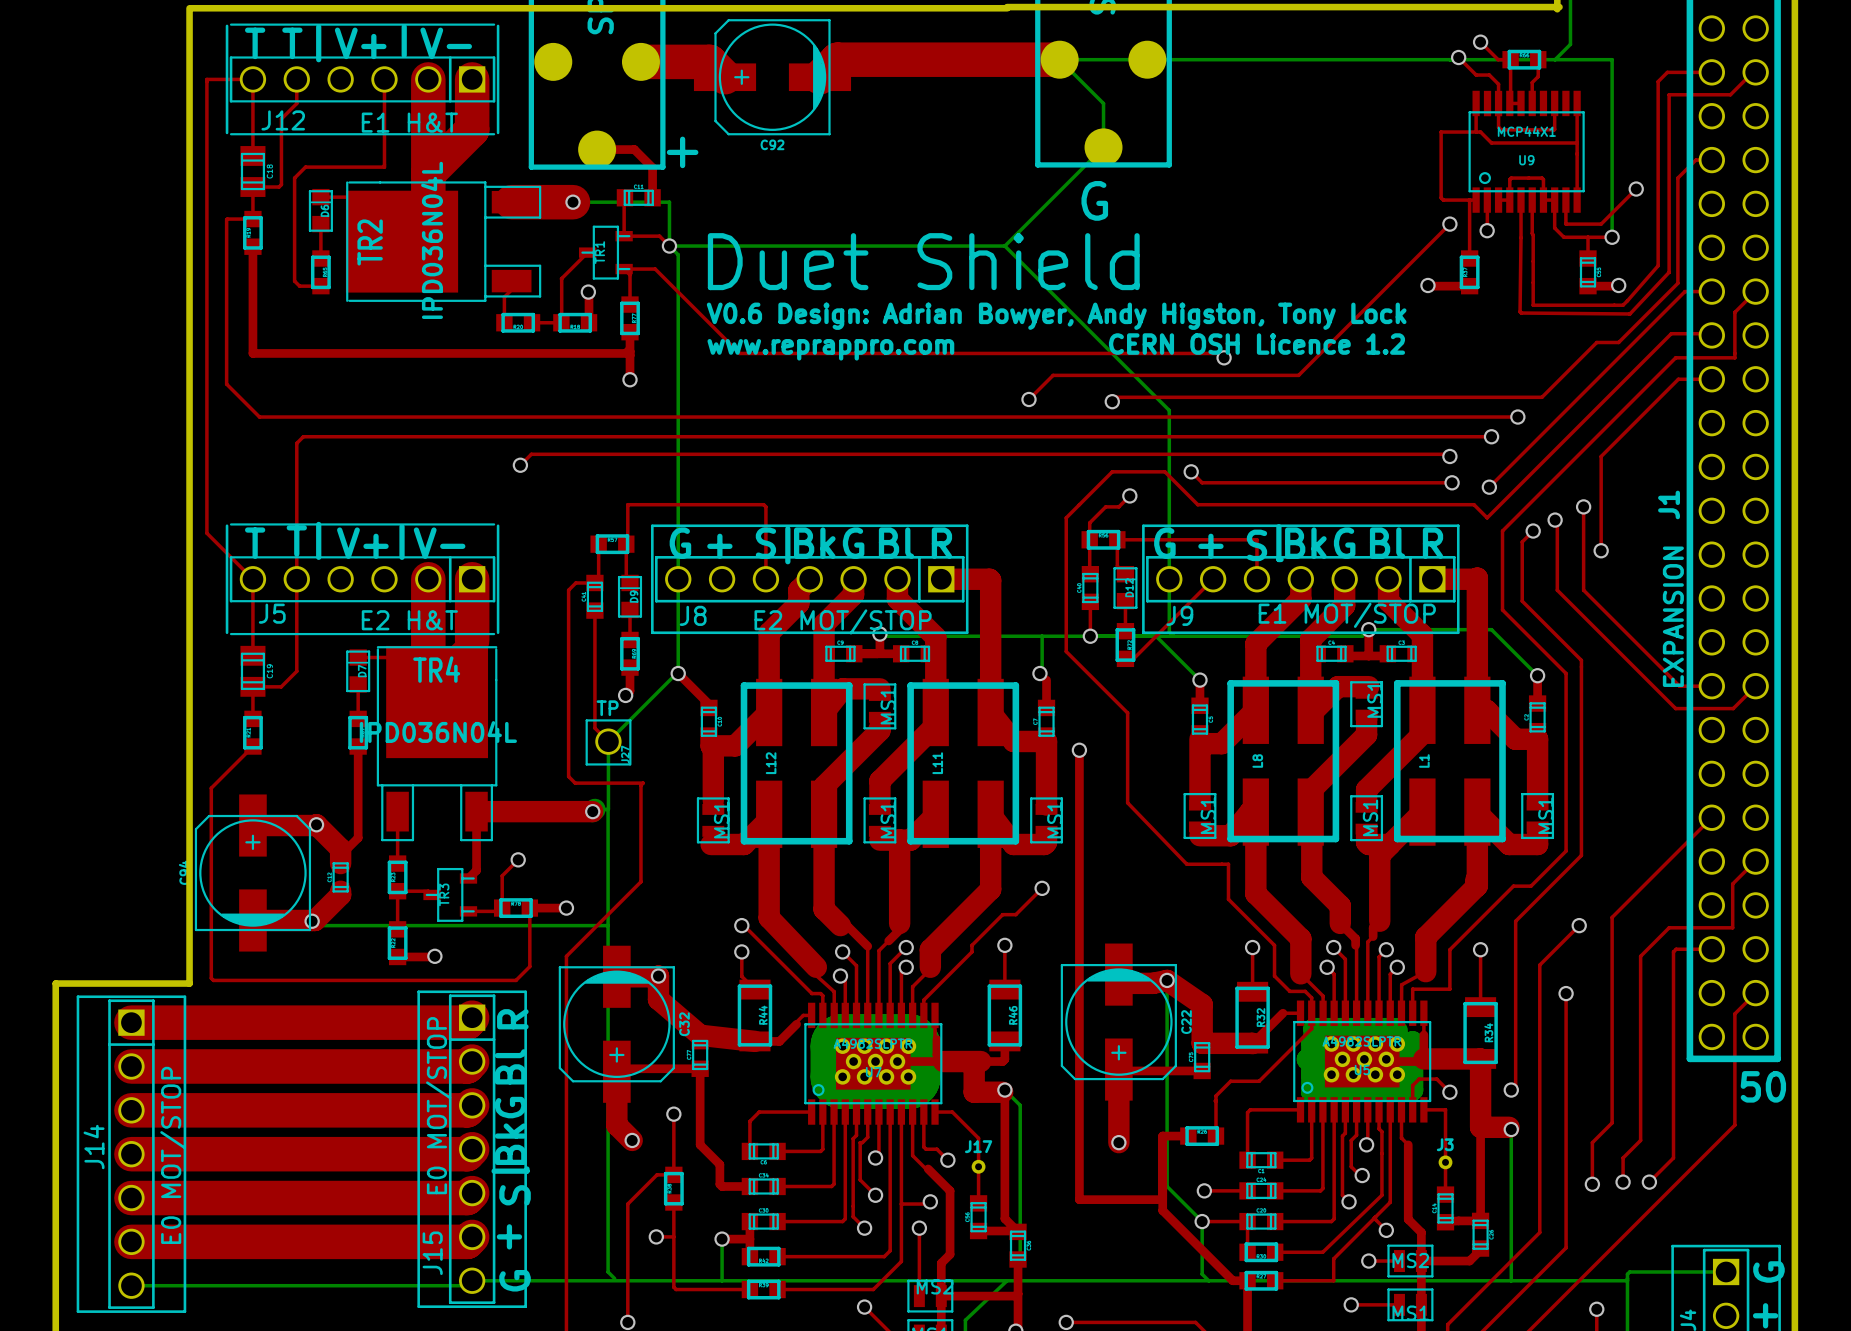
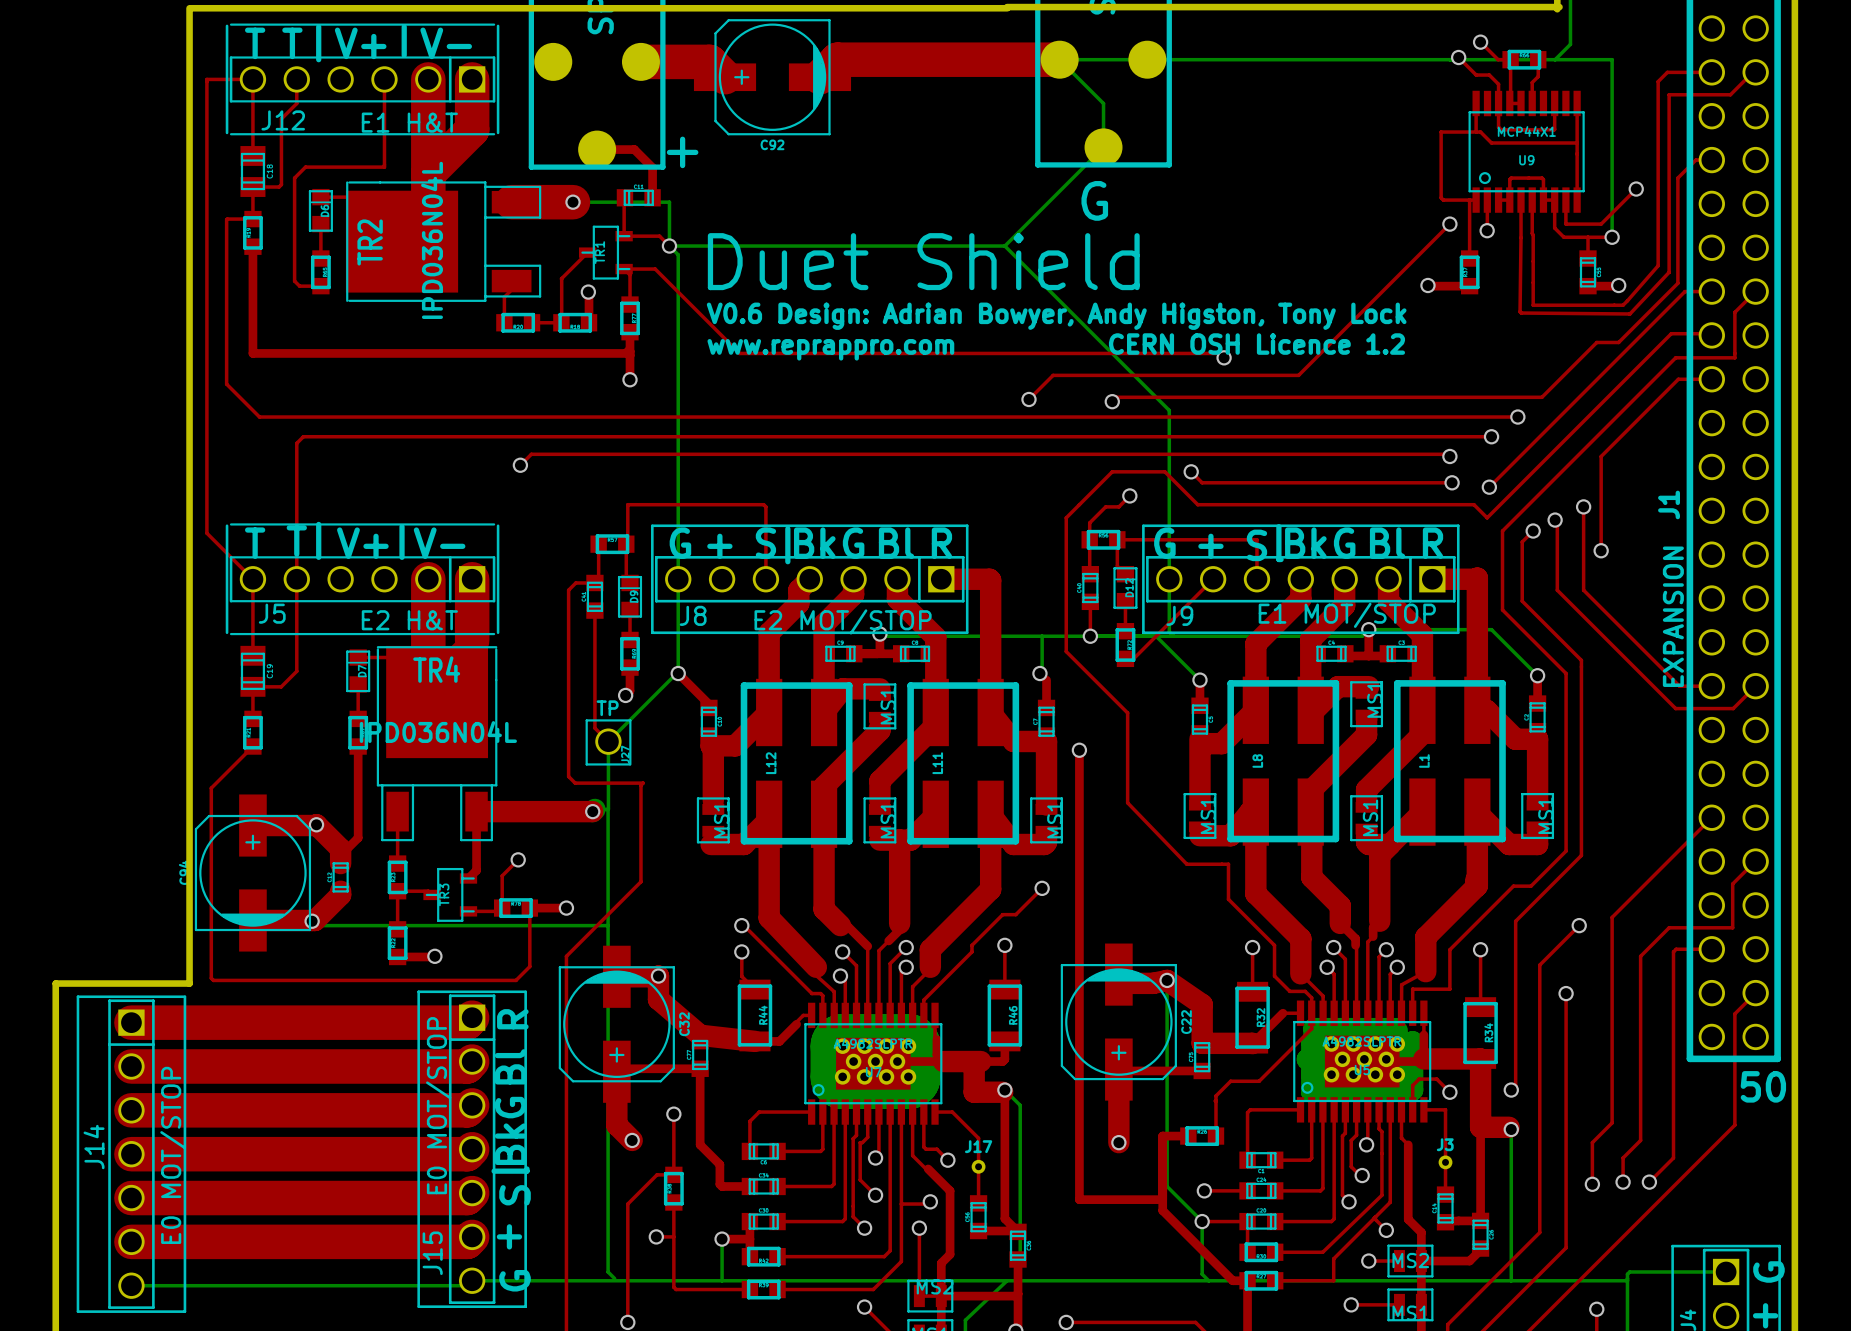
top track: none -> (919, 1296) (941, 1296)

